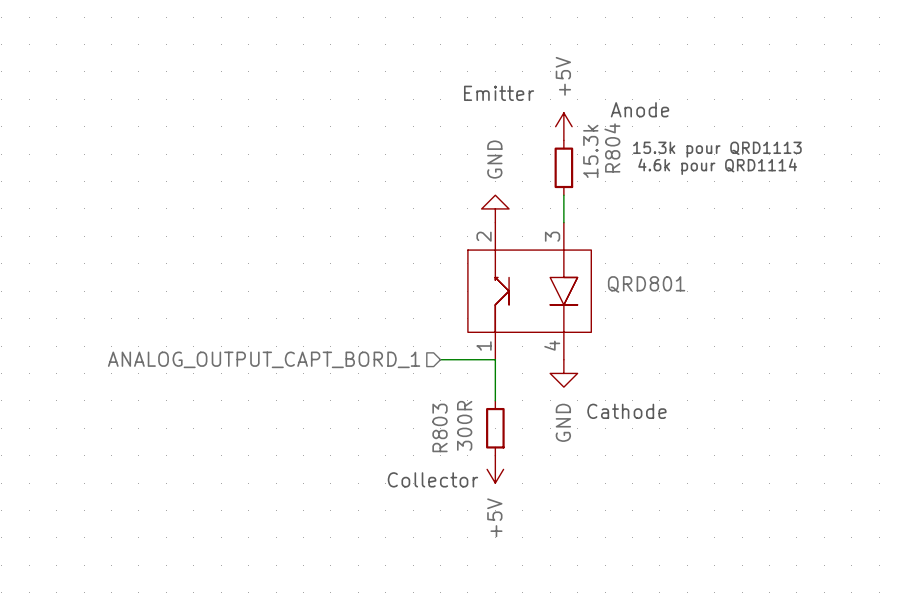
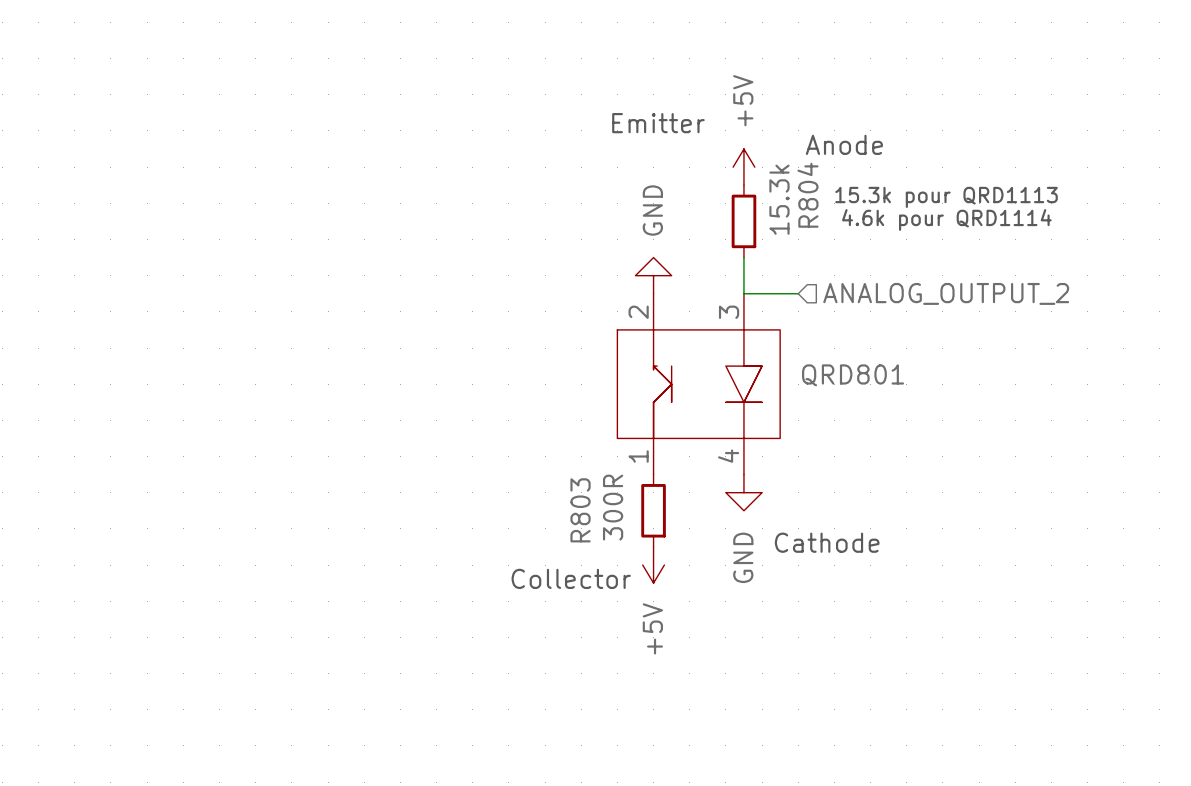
wire: none -> (743, 293) (798, 293)
hierarchical label: none -> ANALOG_OUTPUT_2 (946, 293)
hierarchical label: ANALOG_OUTPUT_CAPT_BORD_1 (264, 359) -> none
wire: (440, 359) (495, 359) (495, 400) -> none
R803 position: (495, 428) -> (653, 510)
power symbol position: +5V (495, 469) -> +5V (653, 565)
text position: Collector (432, 479) -> Collector (571, 578)

